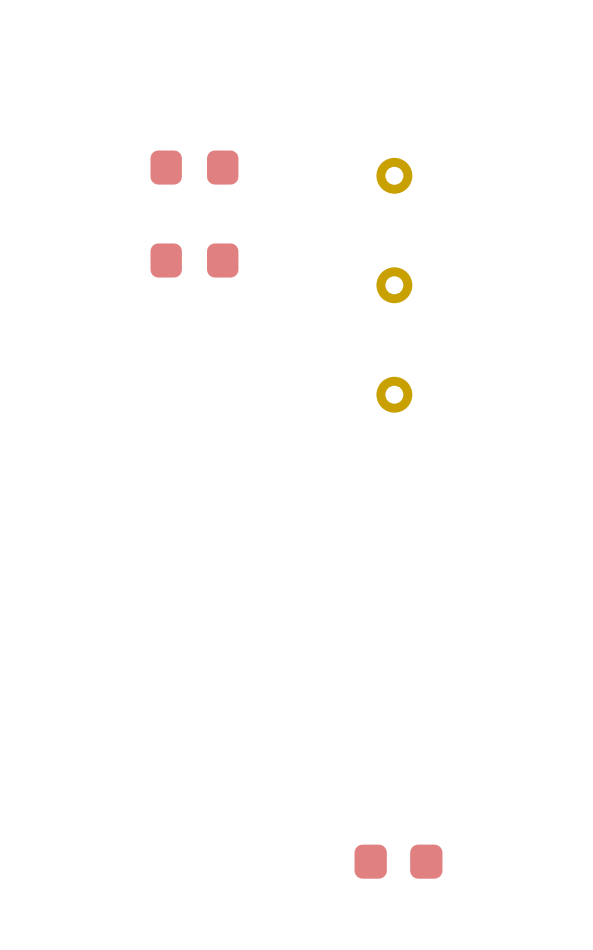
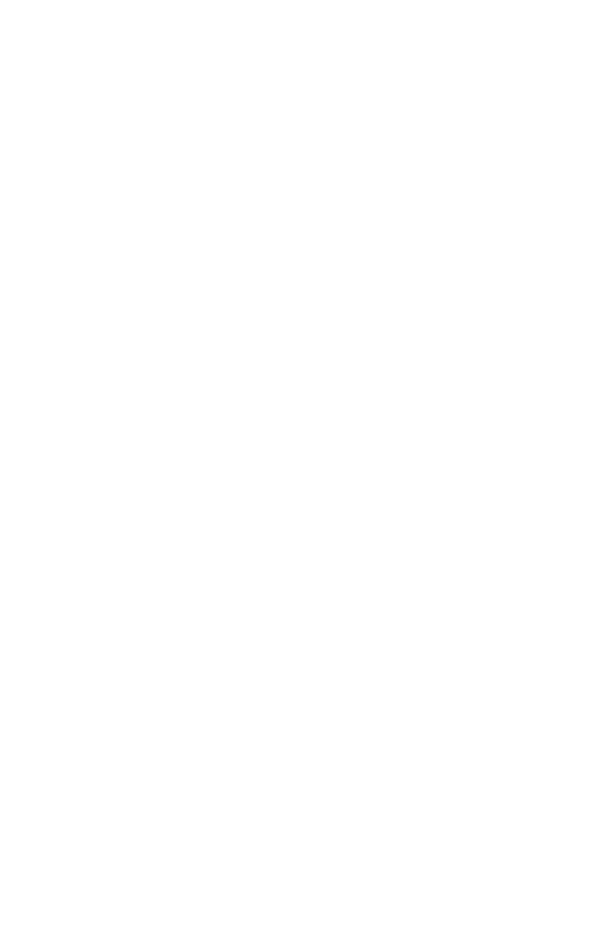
part: (194, 167) -> none
part: (394, 175) -> none
part: (194, 260) -> none
part: (394, 285) -> none
part: (394, 394) -> none
part: (398, 861) -> none

